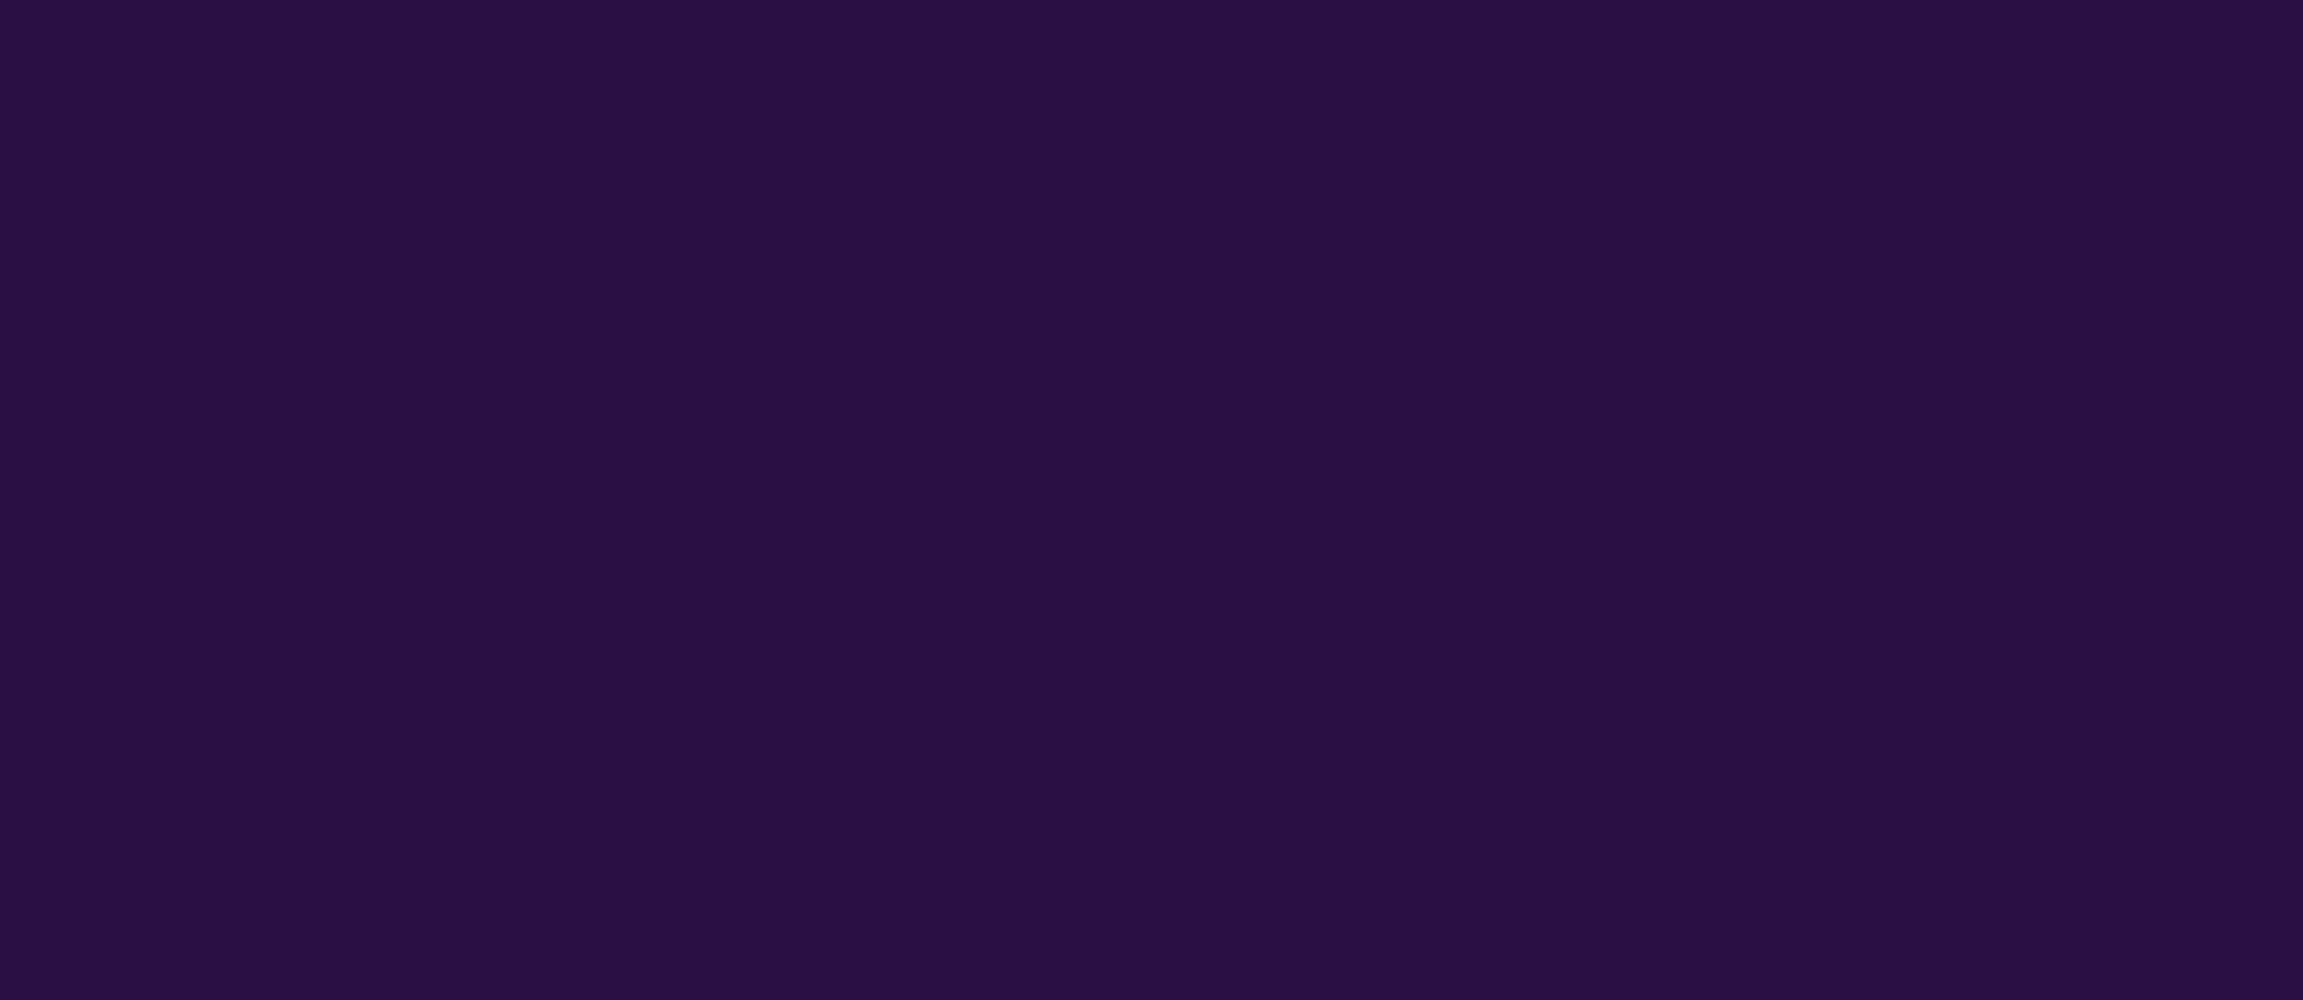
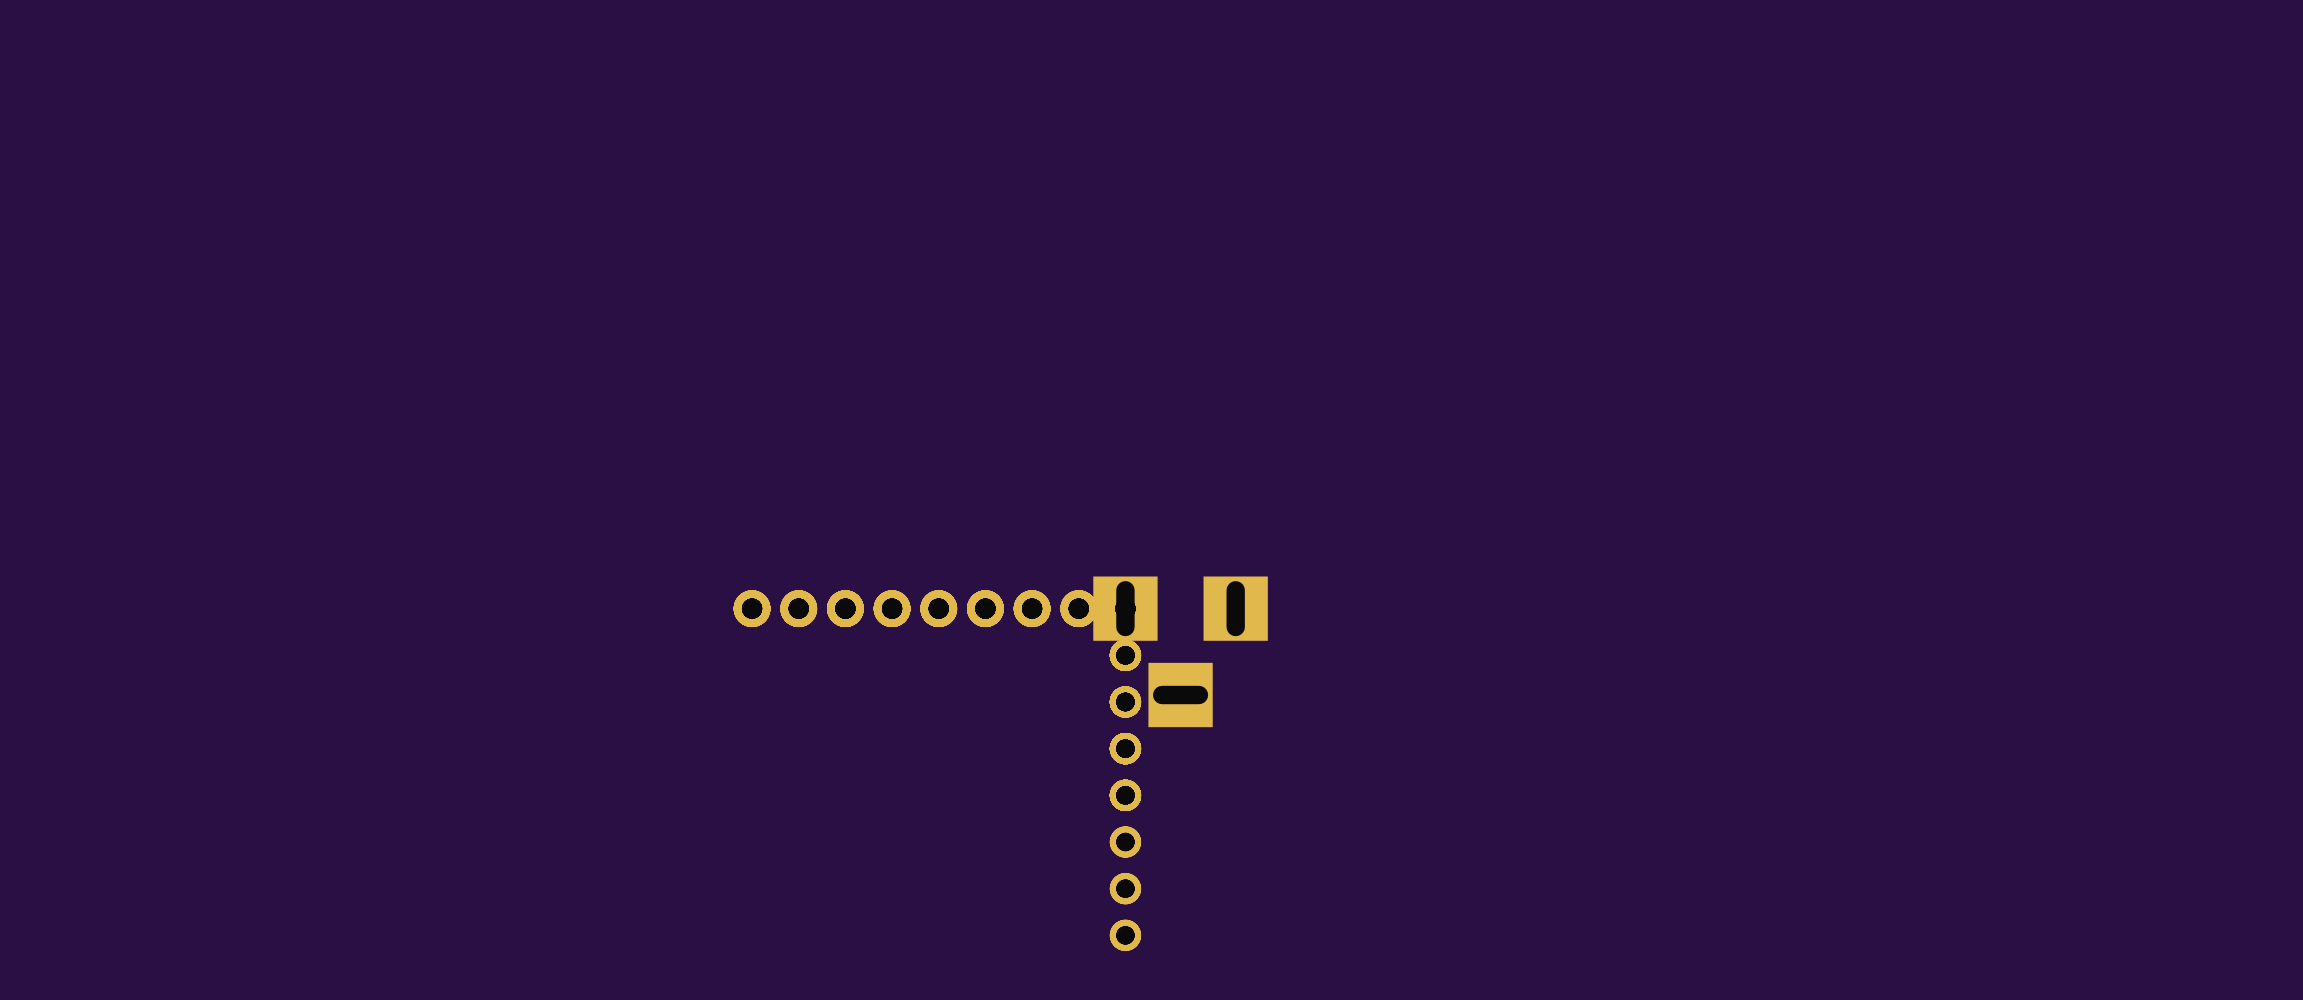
part: none -> (938, 608)
part: none -> (1180, 651)
part: none -> (1125, 701)
part: none -> (1125, 772)

